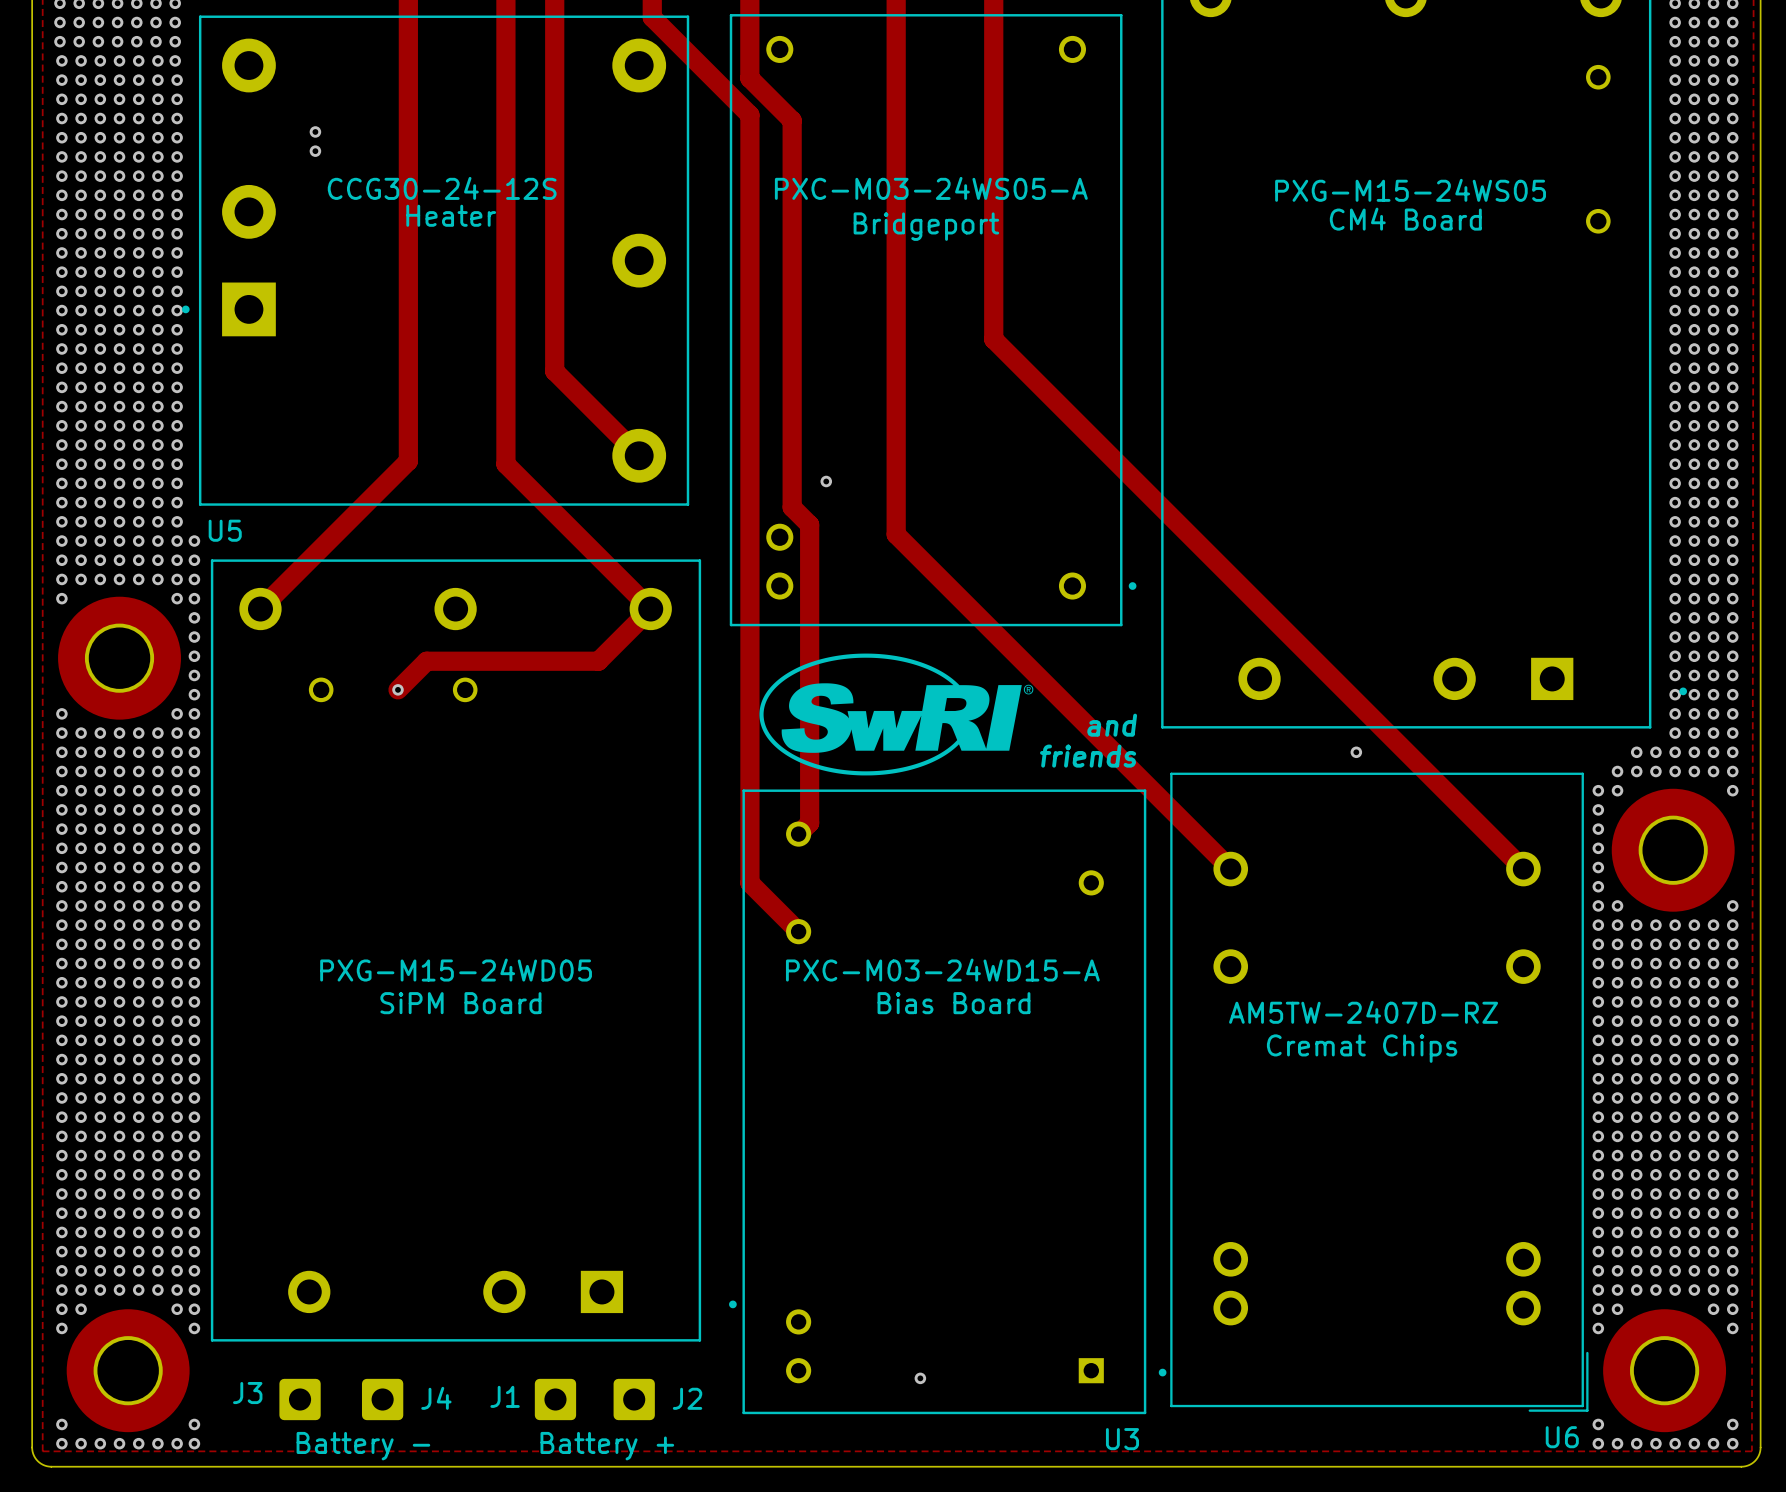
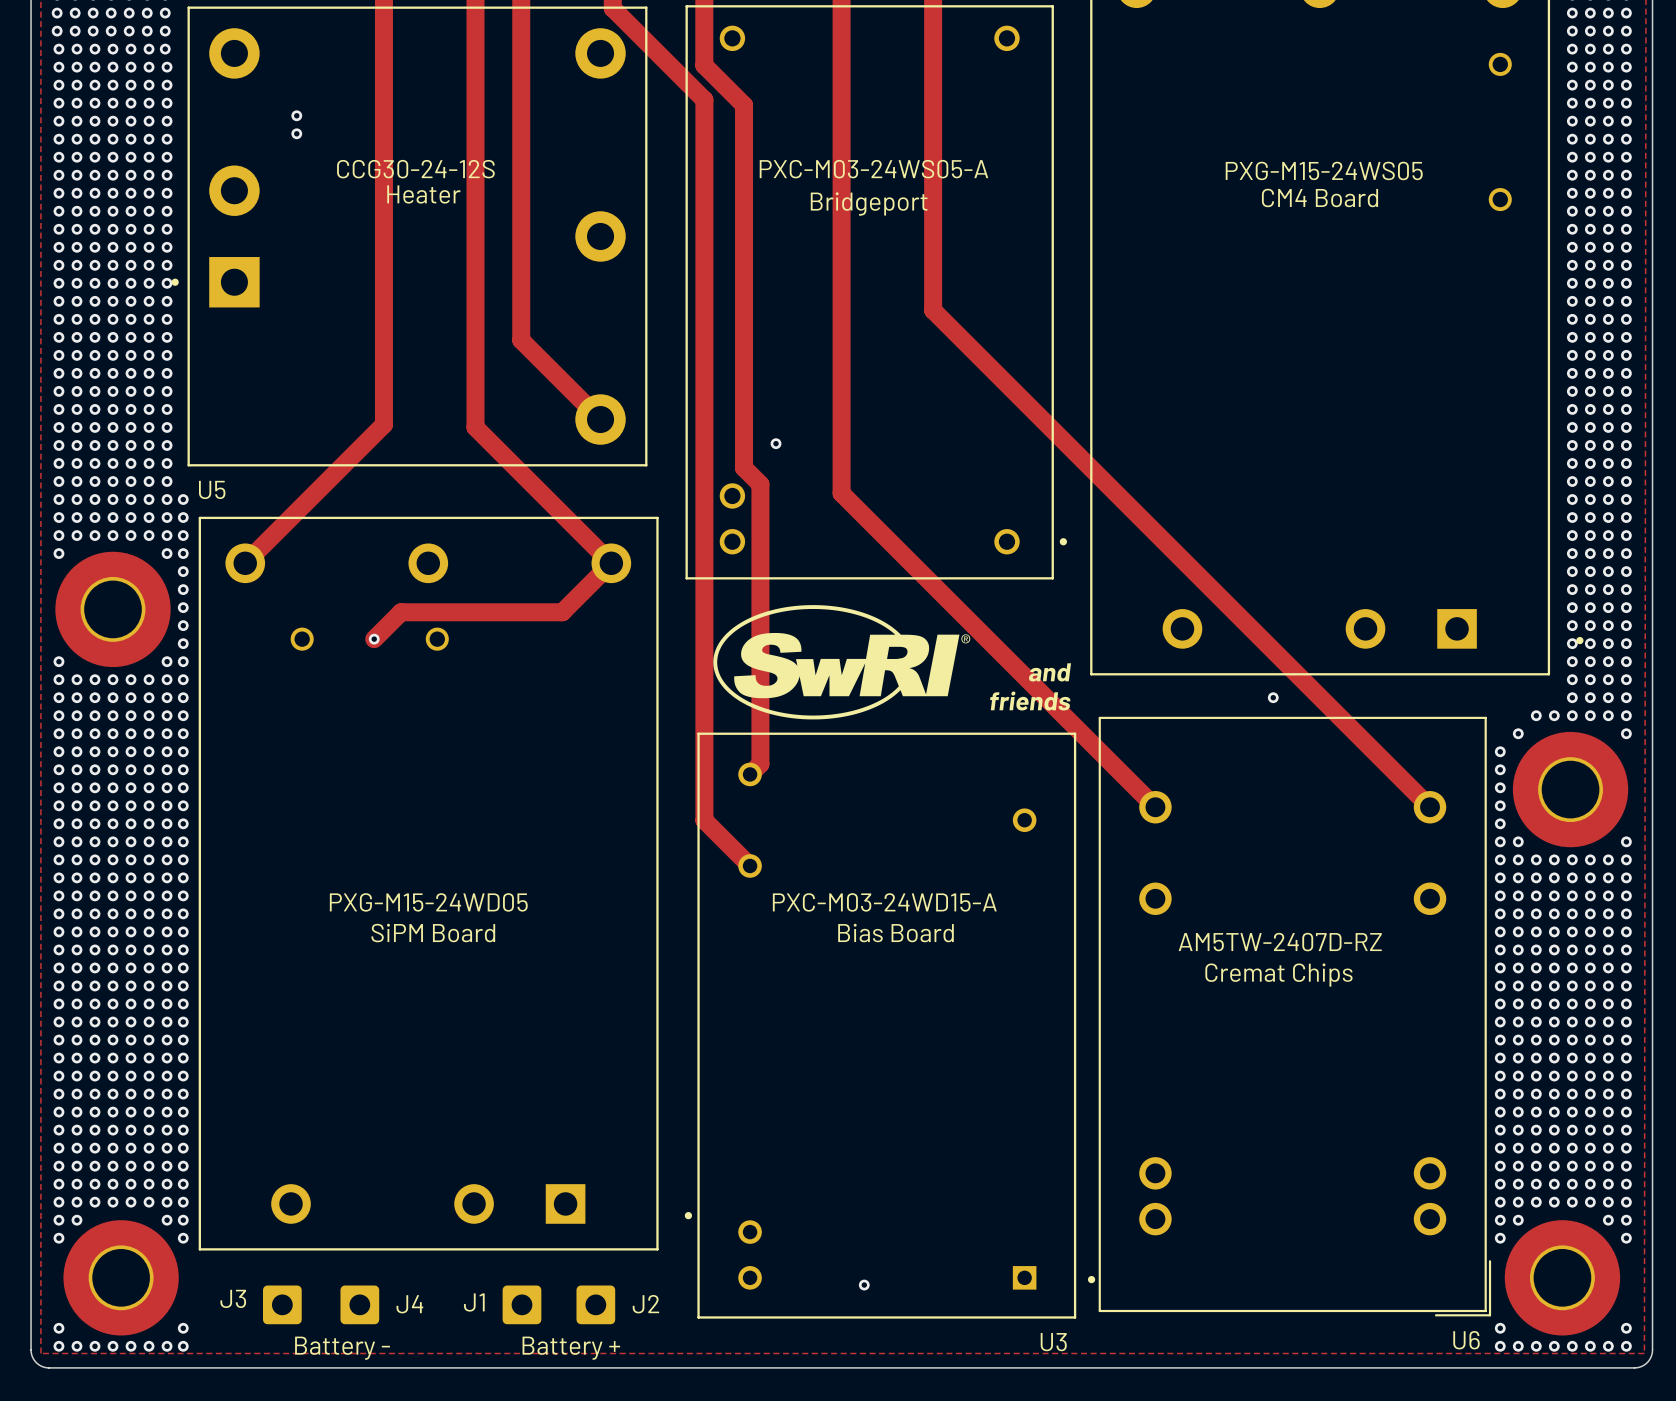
via: (1636, 752) -> none
via: (1655, 752) -> none
via: (1617, 771) -> none
via: (1598, 790) -> none

